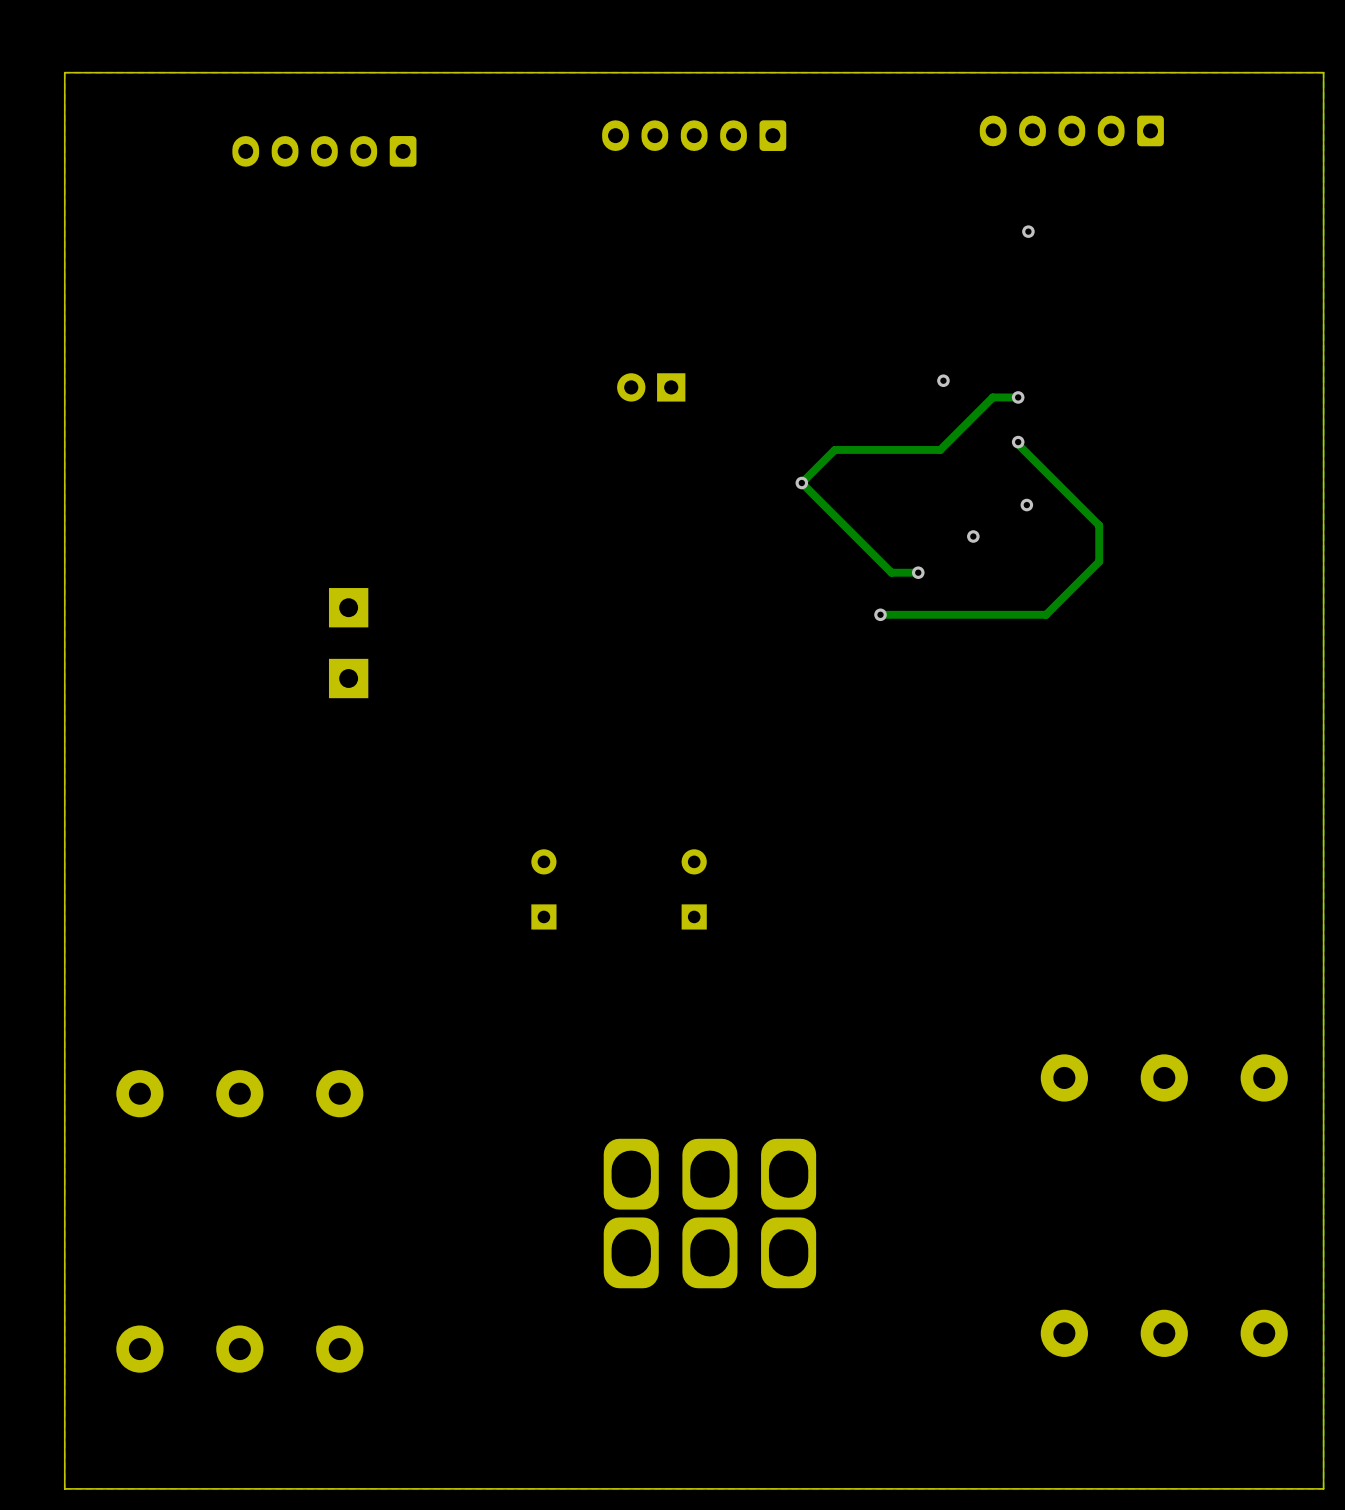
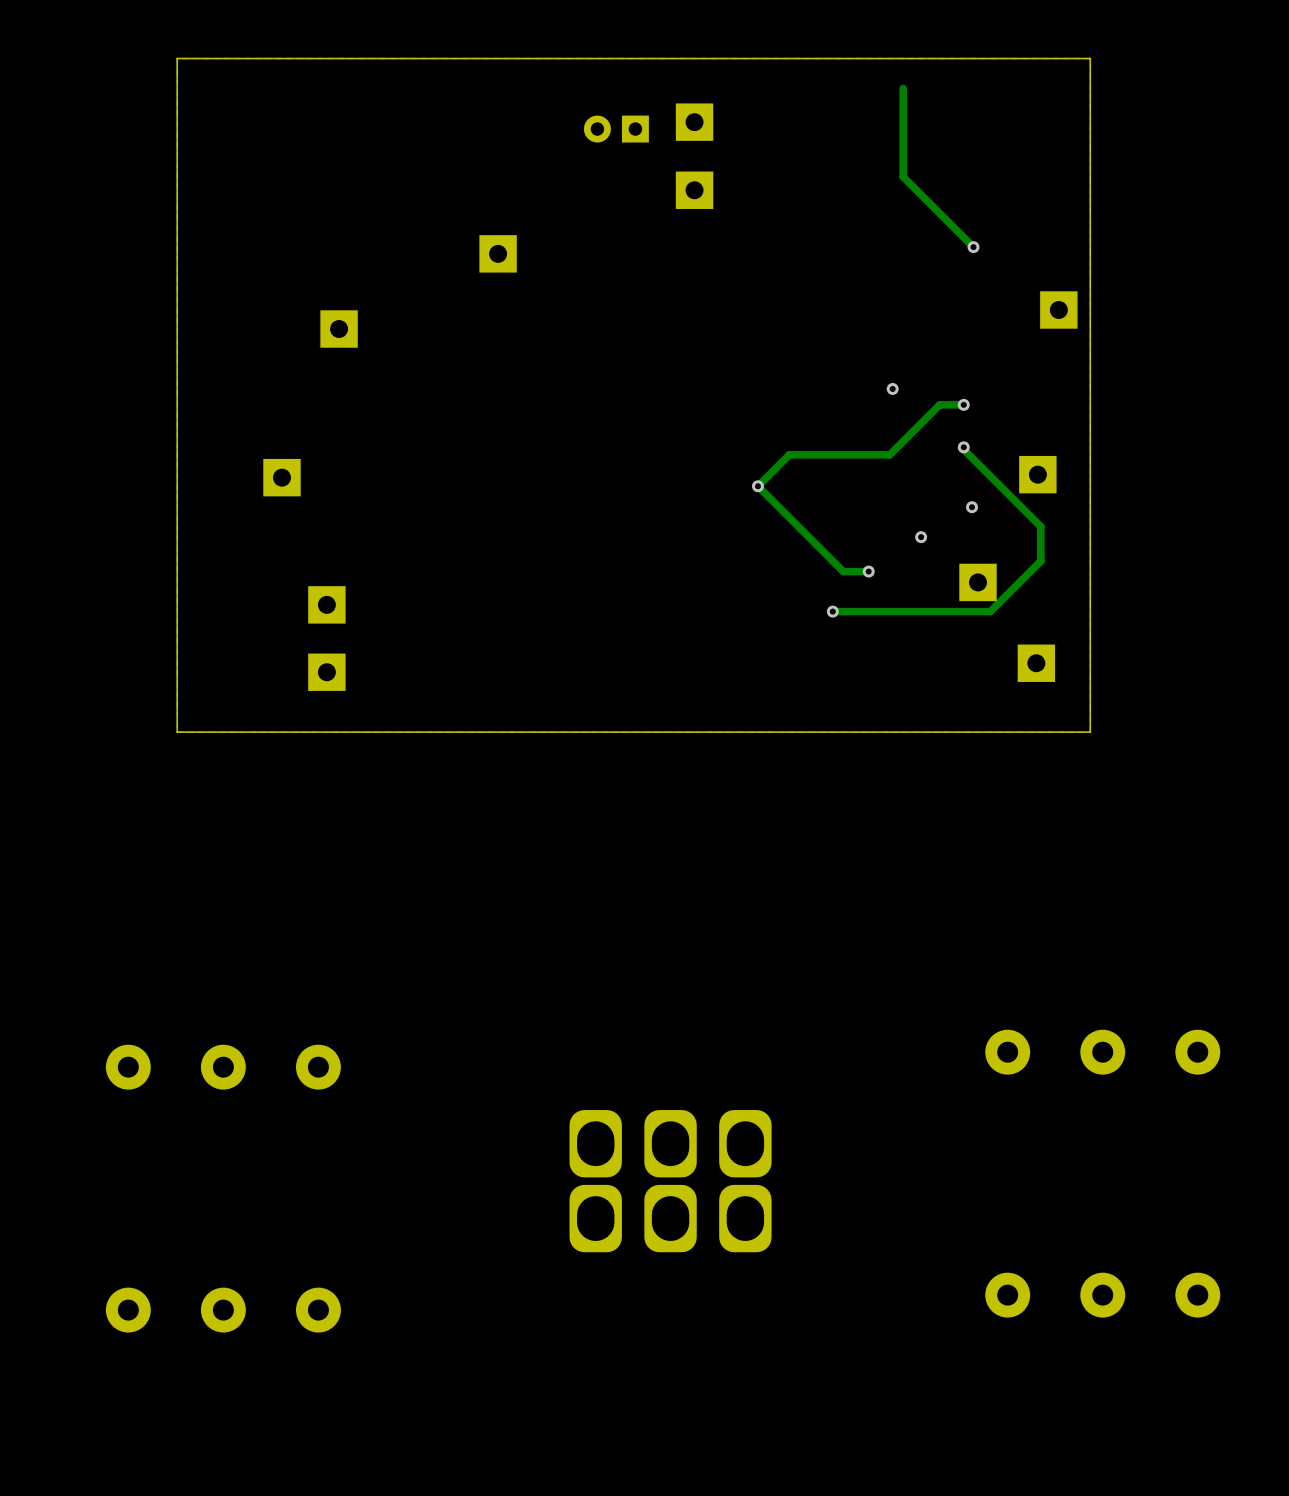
board edge: none -> (1090, 58) (177, 58) (177, 732) (1090, 732) (1090, 58)
track: none -> (903, 88) (903, 176) (973, 247)
board edge: (1323, 72) (64, 72) (64, 1488) (1323, 1488) (1323, 72) -> none
part: none -> (694, 122)
part: (1071, 130) -> none
part: (694, 135) -> none
part: (324, 151) -> none
part: none -> (694, 190)
part: none -> (498, 253)
part: none -> (1058, 310)
part: none -> (339, 329)
part position: (651, 387) -> (616, 129)
part: none -> (1037, 474)
part: none -> (281, 477)
part: none -> (978, 582)
part: none -> (1036, 663)
part: (543, 889) -> none
part: (694, 889) -> none

